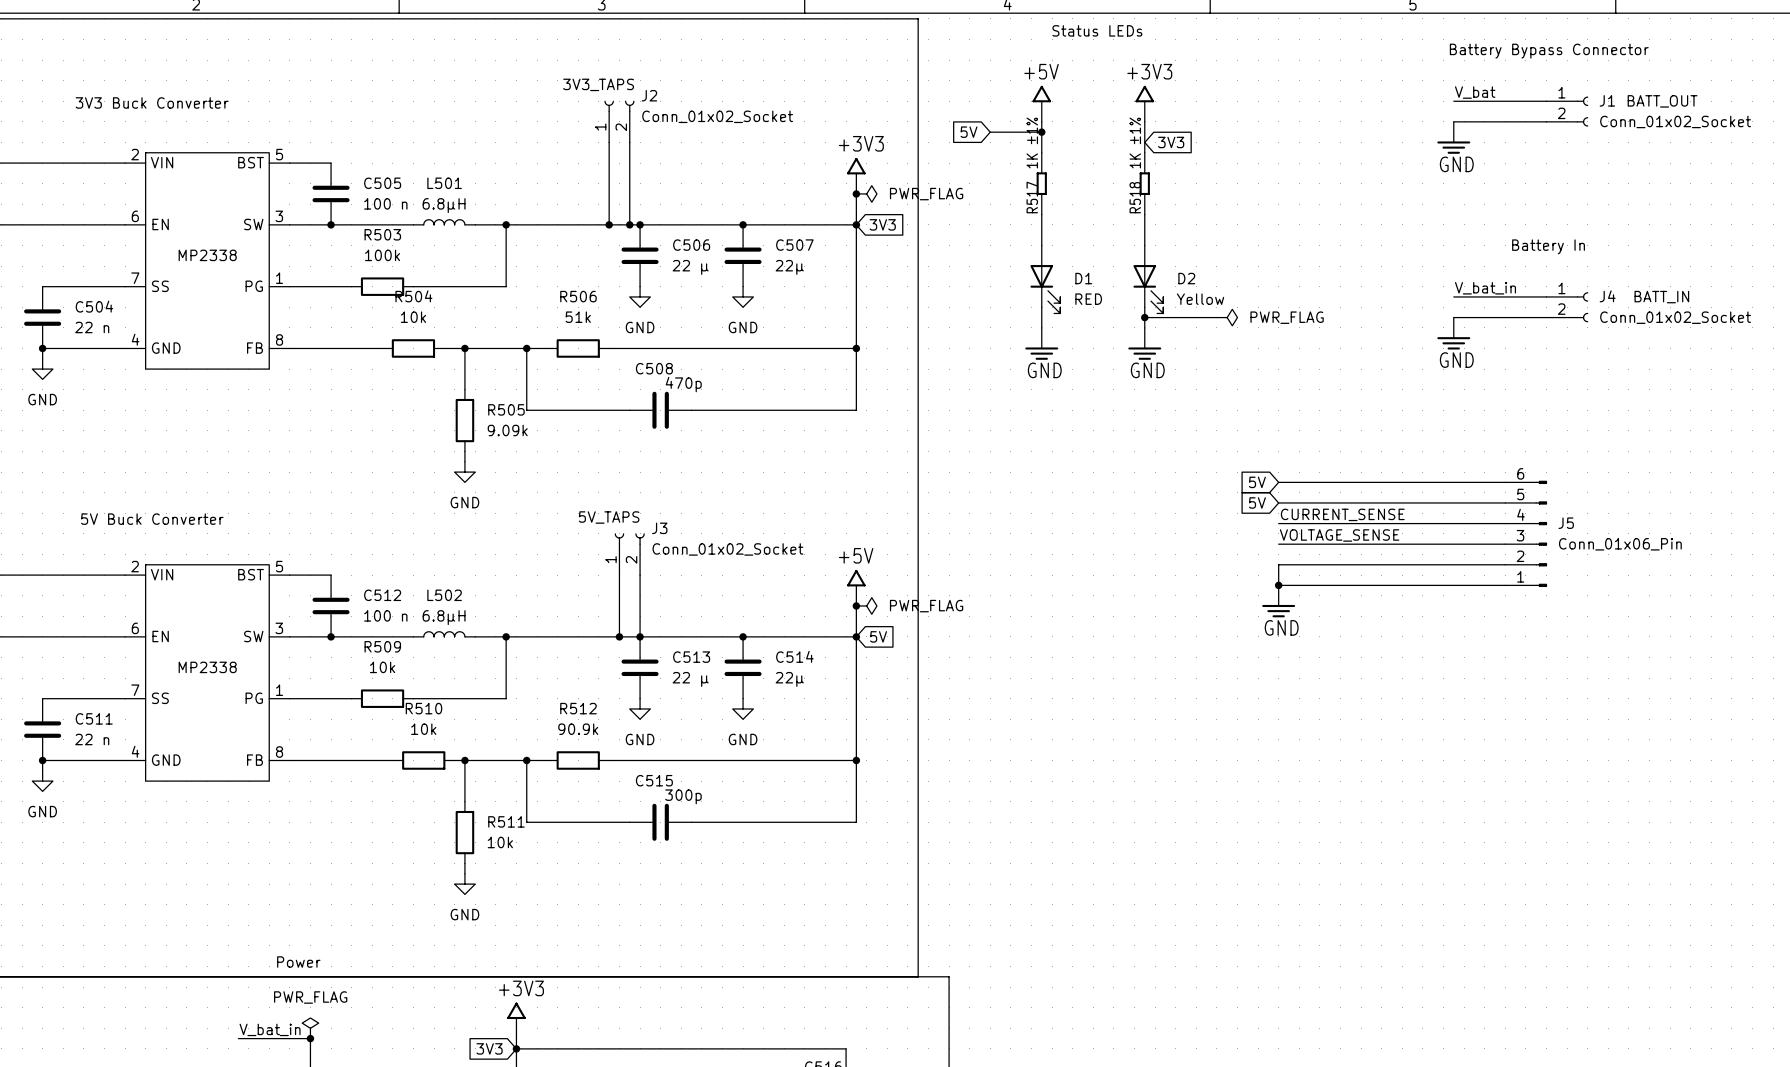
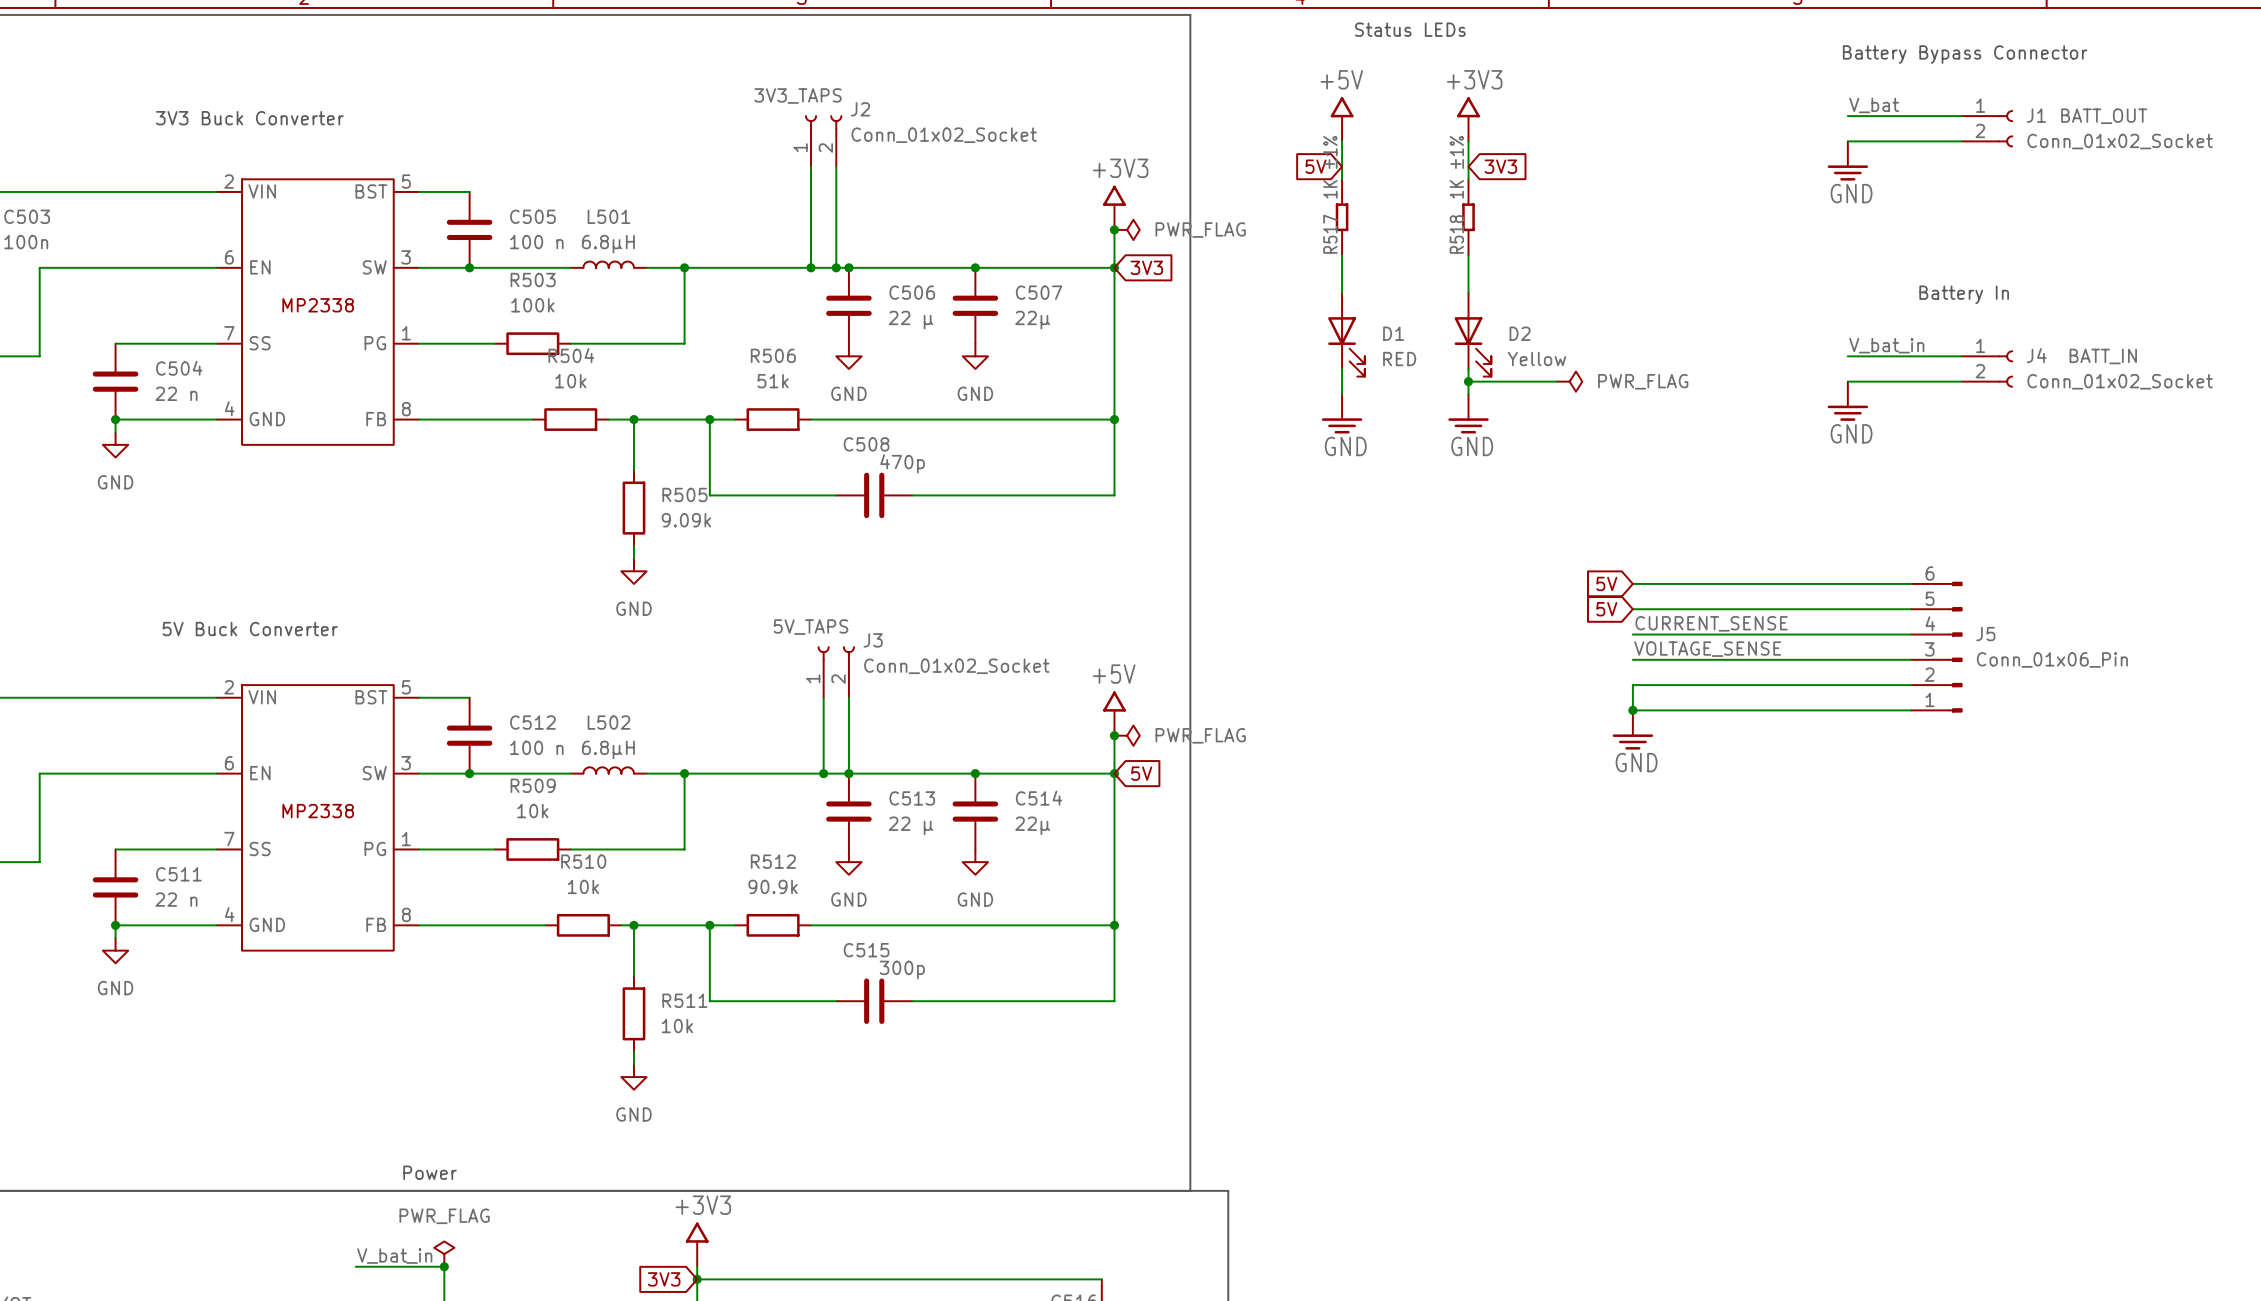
global label position: 5V (969, 132) -> 5V (1316, 166)
wire: (990, 132) (1041, 132) -> none
junction: (1041, 132) -> none

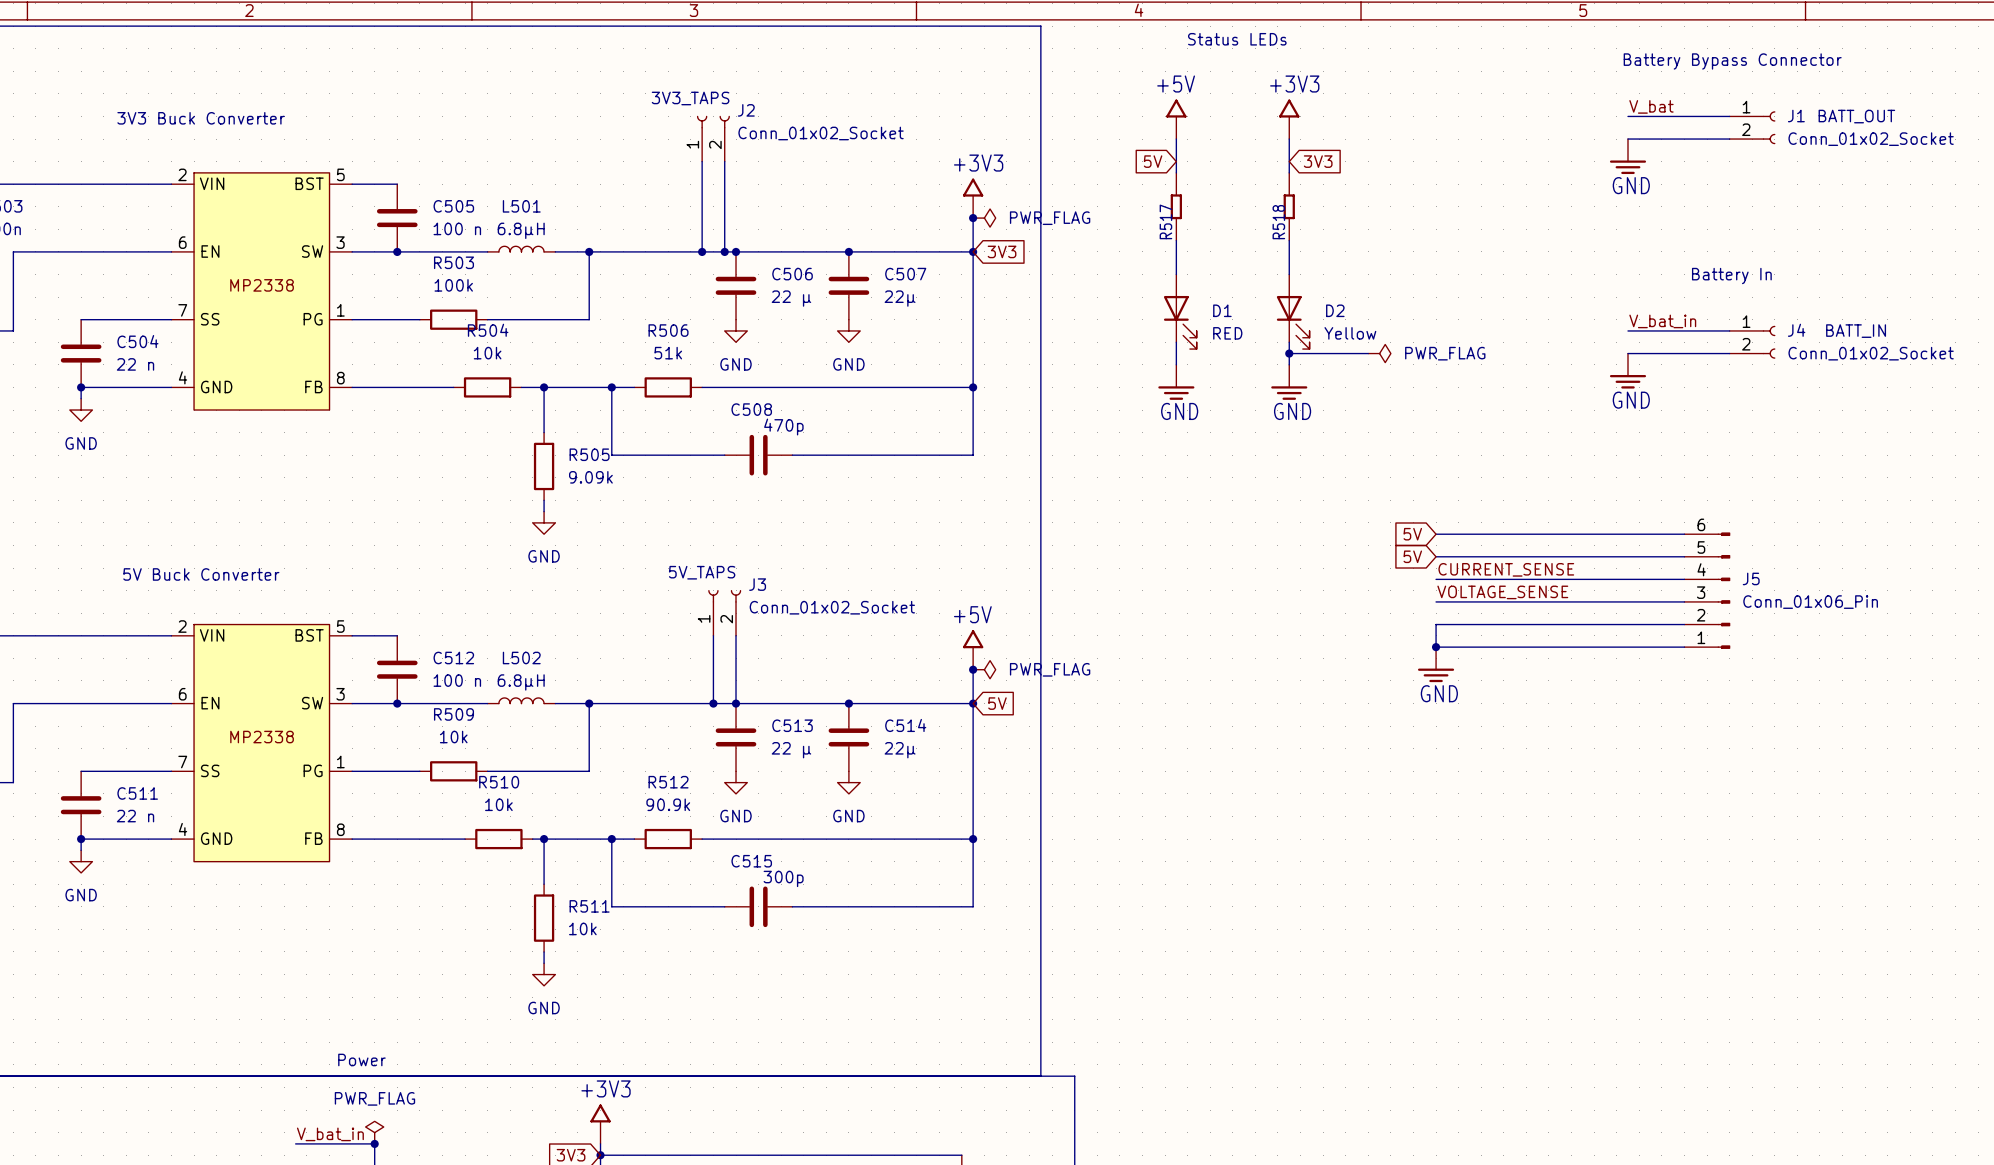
R517 value: 1K ±1% (1330, 167) -> none
R518 value: 1K ±1% (1456, 167) -> none

